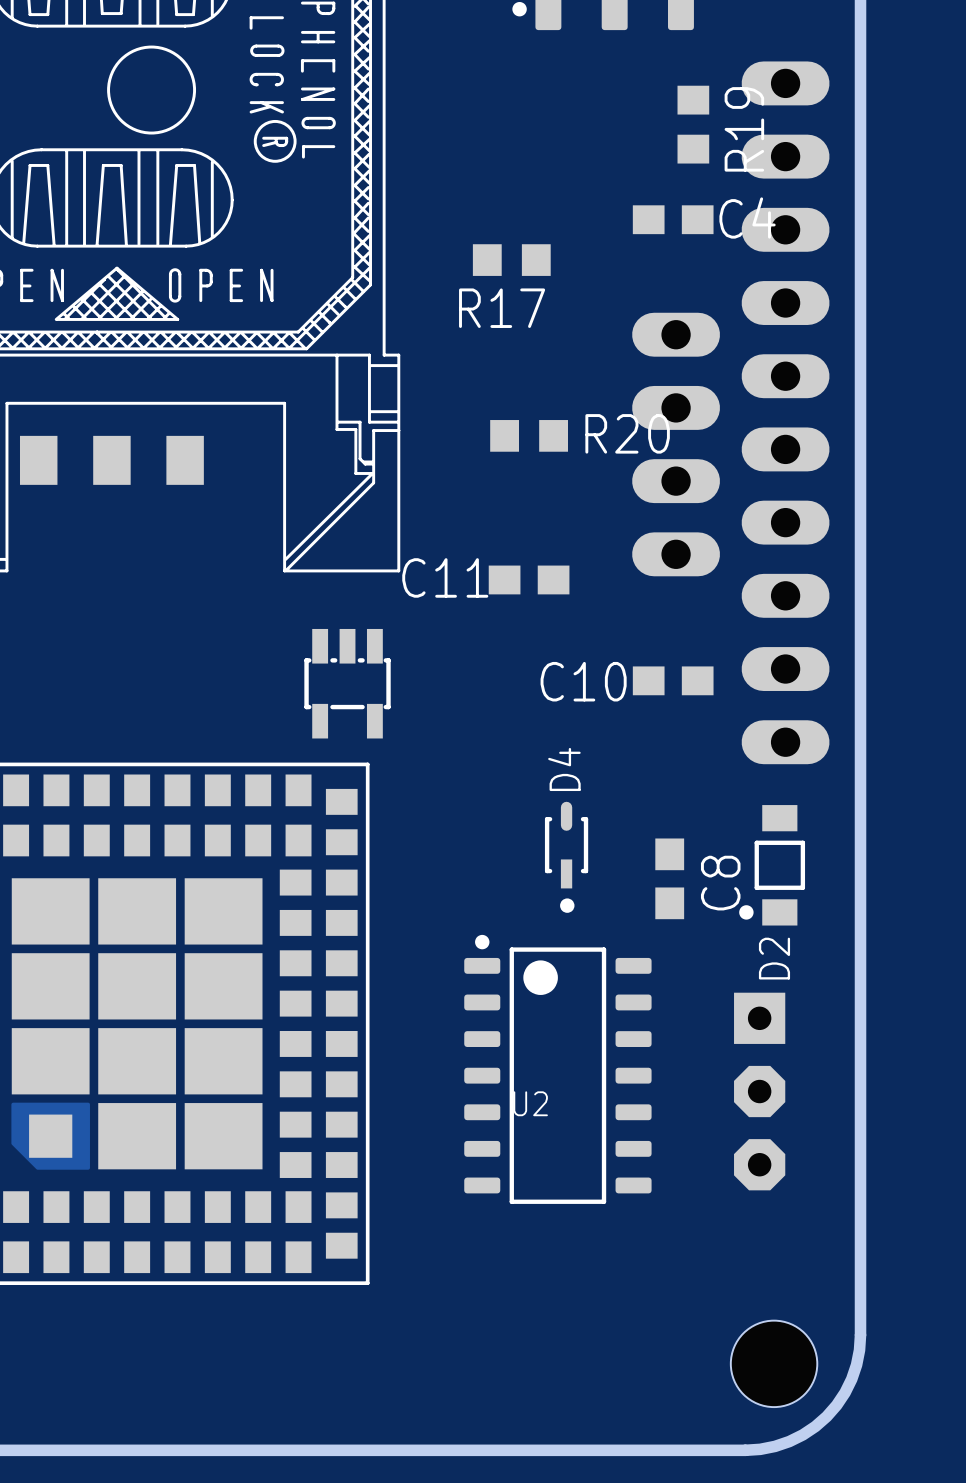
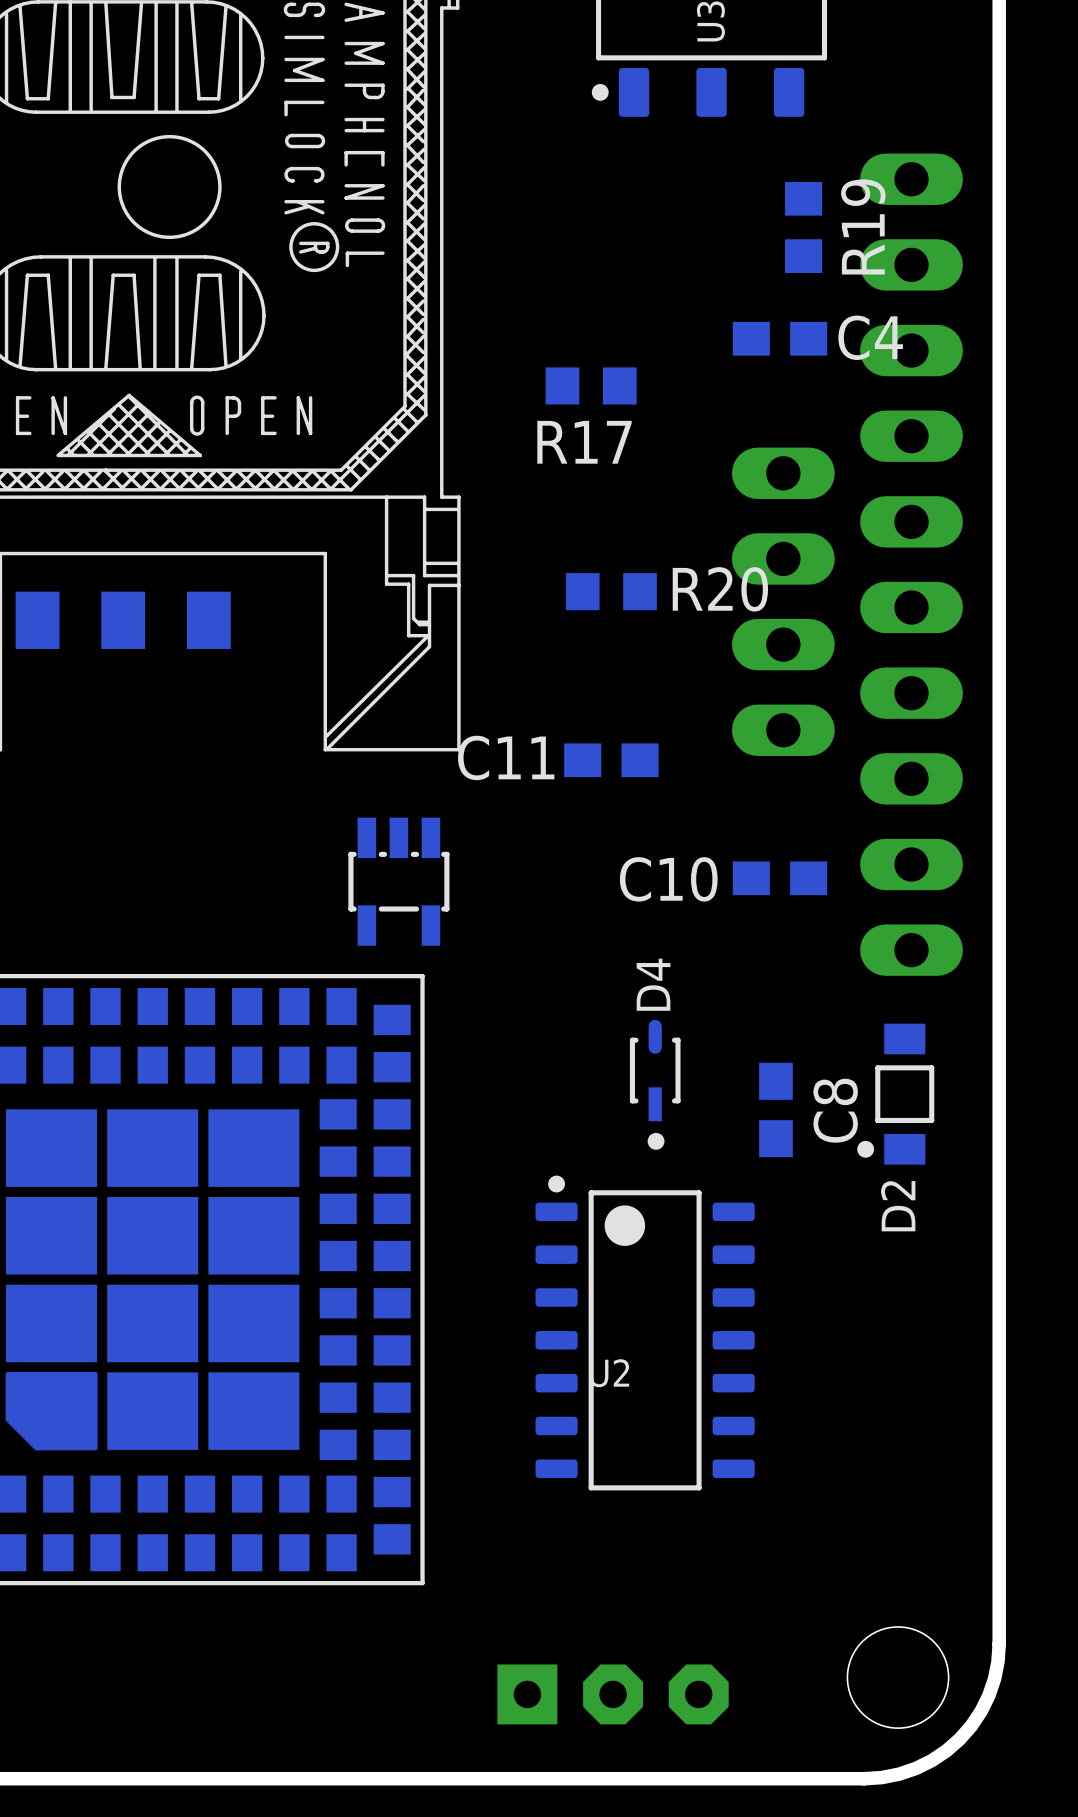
part rotation: 0° (759, 1091) -> 90° counterclockwise (613, 1694)
part position: (759, 1091) -> (613, 1694)

